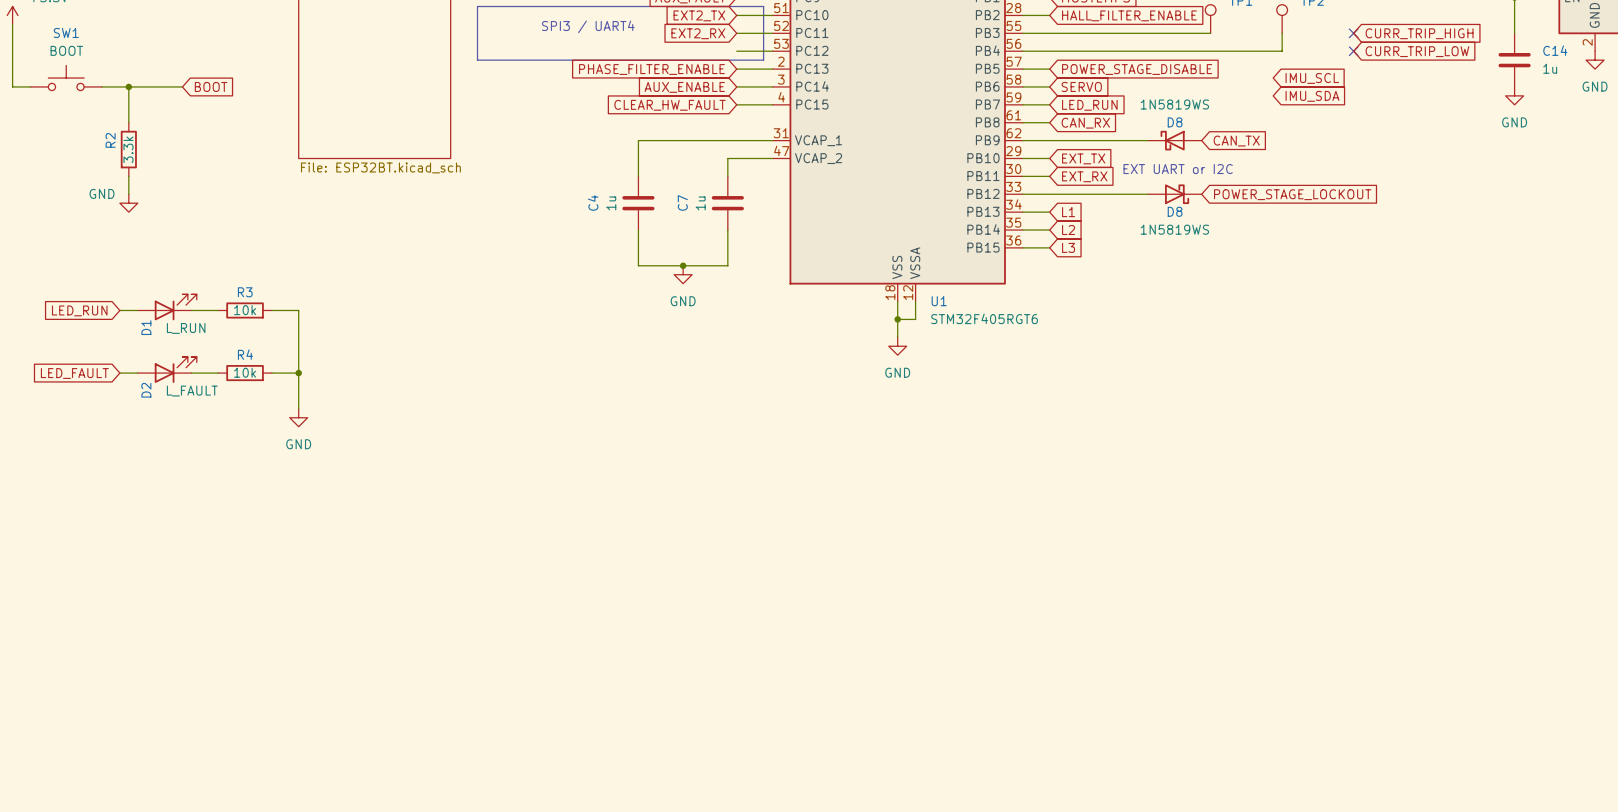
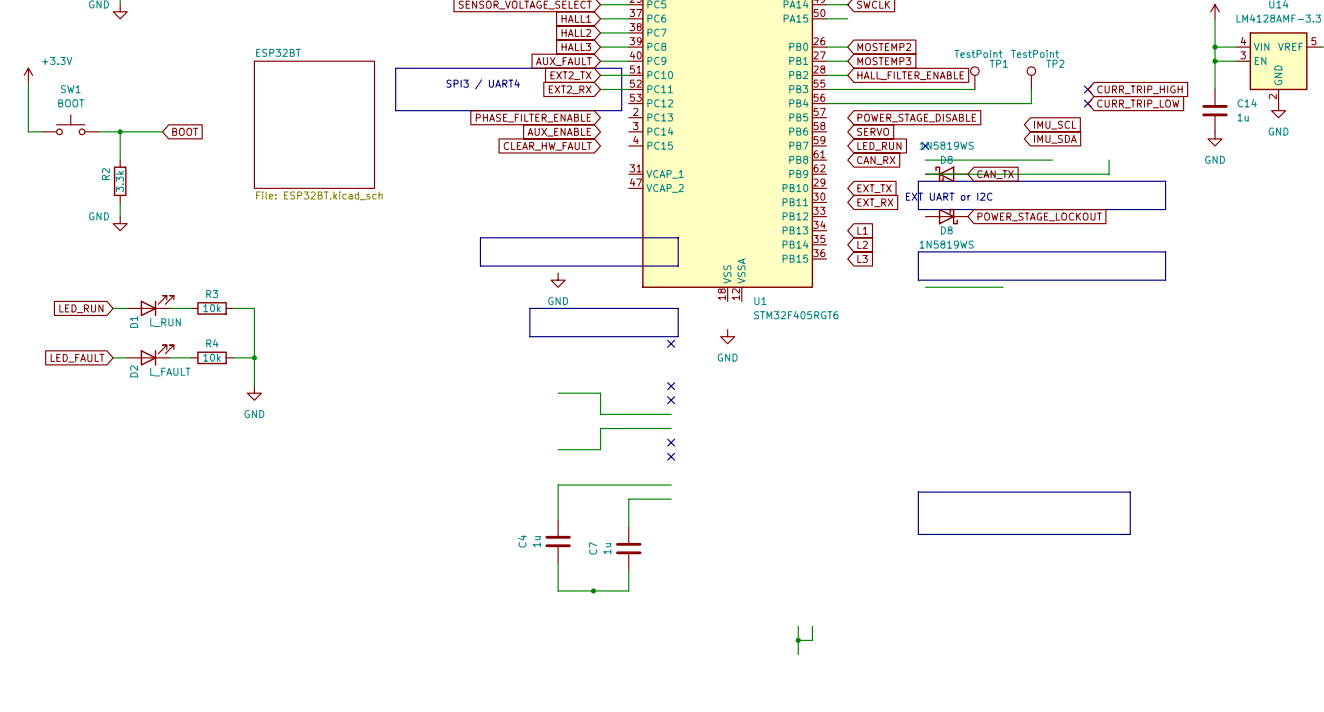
wire: (736, 51) (772, 51) -> none
wire: (736, 69) (772, 69) -> none
wire: (1022, 69) (1049, 69) -> none
wire: (736, 86) (772, 86) -> none
wire: (1022, 86) (1049, 86) -> none
wire: (736, 104) (772, 104) -> none
wire: (1022, 104) (1049, 104) -> none
no-connect mark: none -> (925, 145)
wire: (1022, 122) (1049, 122) -> none
wire: none -> (925, 160) (1052, 160)
wire: (772, 140) (638, 140) (638, 176) -> none
wire: (1022, 140) (1148, 140) -> (1109, 160) (1109, 174) (925, 174)
line: none -> (918, 181) (918, 209) (1165, 209) (1165, 181) (918, 181)
wire: (772, 158) (727, 158) (727, 176) -> none
wire: (1022, 158) (1049, 158) -> none
wire: (1022, 176) (1049, 176) -> none
wire: (1022, 194) (1148, 194) -> none
C4 position: (638, 203) -> (558, 541)
C7 position: (727, 203) -> (628, 548)
wire: (1022, 212) (1049, 212) -> none
line: none -> (480, 237) (678, 237) (678, 266) (480, 266) (480, 237)
wire: (638, 230) (638, 265) (727, 265) (727, 230) -> none
wire: (1022, 230) (1049, 230) -> none
line: none -> (918, 251) (1165, 251) (1165, 280) (918, 280) (918, 251)
wire: (1022, 247) (1049, 247) -> none
junction: (683, 265) -> none
wire: none -> (925, 287) (1003, 287)
wire: (897, 301) (897, 337) -> none
wire: (915, 301) (915, 319) (897, 319) -> none
line: none -> (529, 308) (678, 308) (678, 336) (529, 336) (529, 308)
junction: (897, 319) -> none
no-connect mark: none -> (671, 343)
no-connect mark: none -> (671, 386)
wire: none -> (558, 393) (600, 393) (600, 414) (671, 414)
no-connect mark: none -> (671, 400)
wire: none -> (671, 428) (600, 428) (600, 449) (558, 449)
no-connect mark: none -> (671, 442)
no-connect mark: none -> (671, 456)
wire: none -> (671, 485) (558, 485) (558, 520)
line: none -> (918, 492) (918, 534) (1130, 534) (1130, 492) (918, 492)
wire: none -> (671, 499) (628, 499) (628, 527)
wire: none -> (558, 562) (558, 590) (628, 590) (628, 569)
junction: none -> (593, 590)
wire: none -> (798, 626) (798, 654)
wire: none -> (812, 626) (812, 640) (798, 640)
junction: none -> (798, 640)

